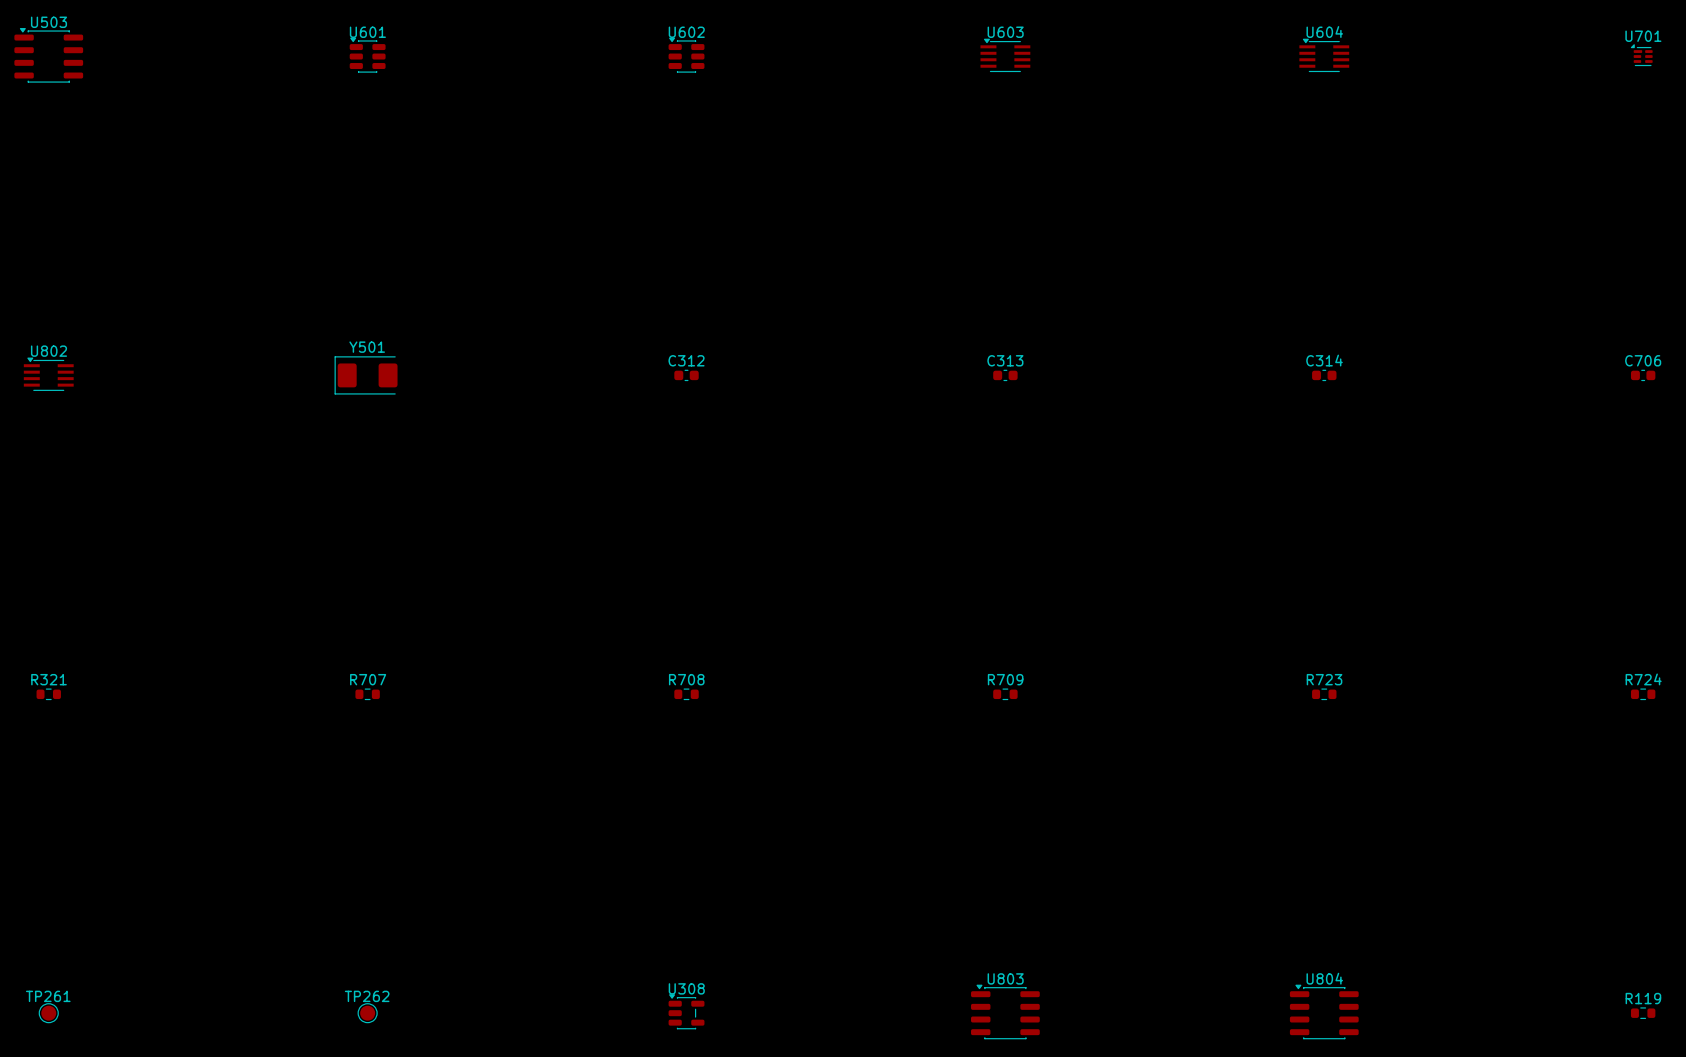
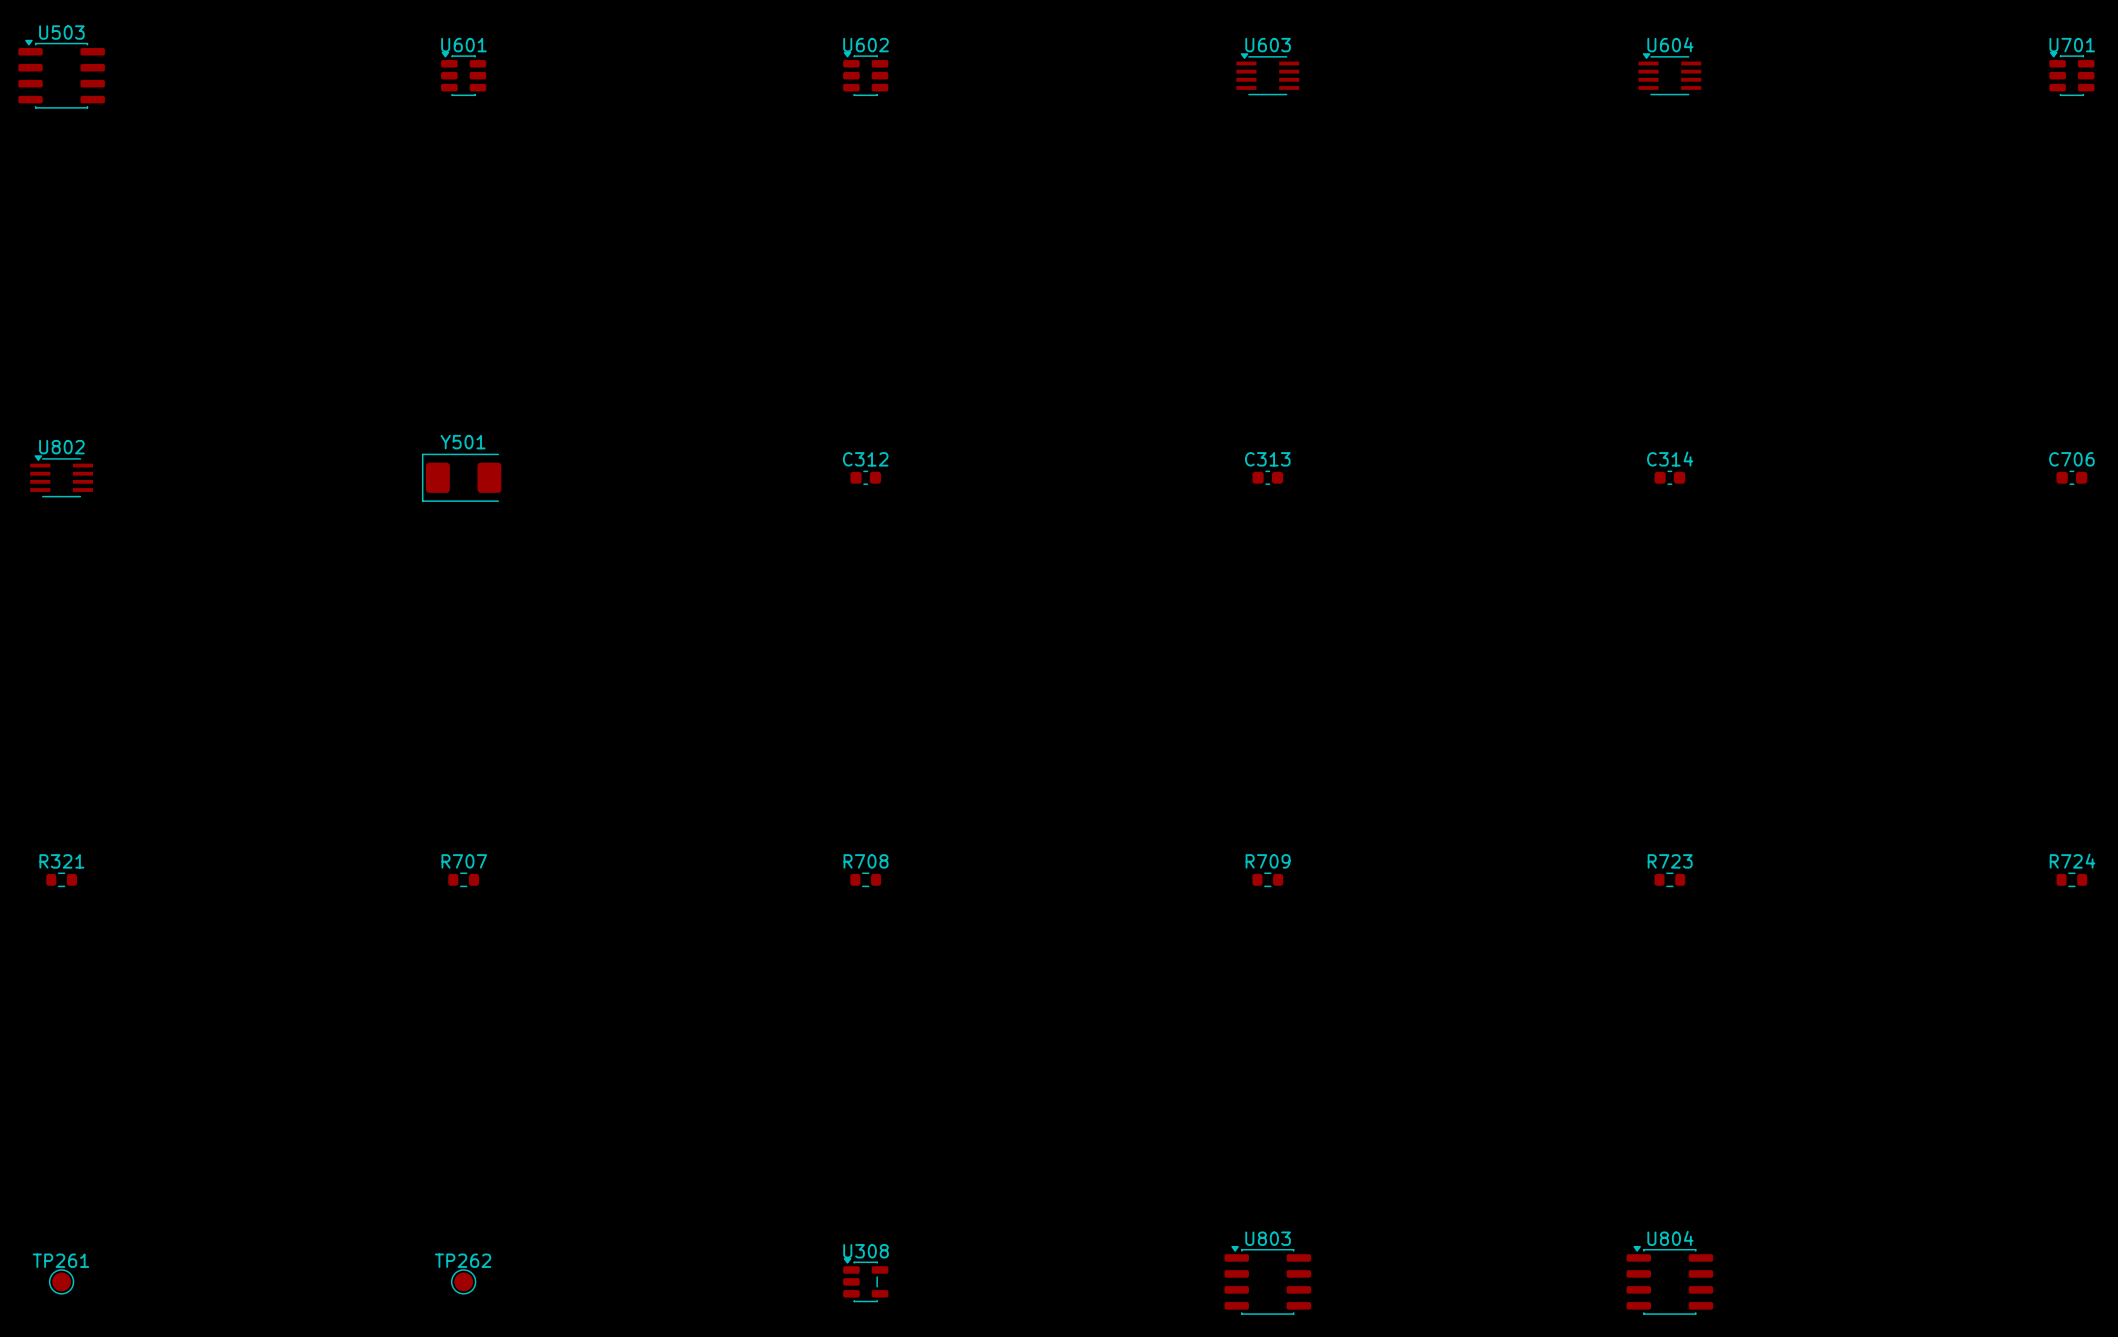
U701 footprint: [1630, 44, 1653, 67] -> [2049, 51, 2095, 97]
R119: (1643, 1013) -> none

